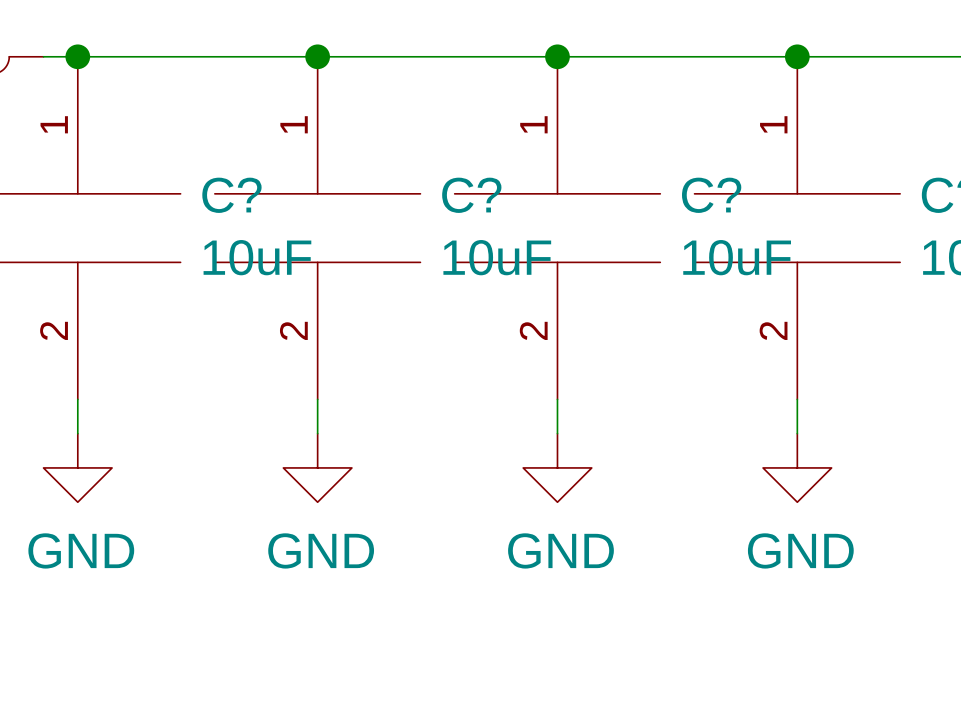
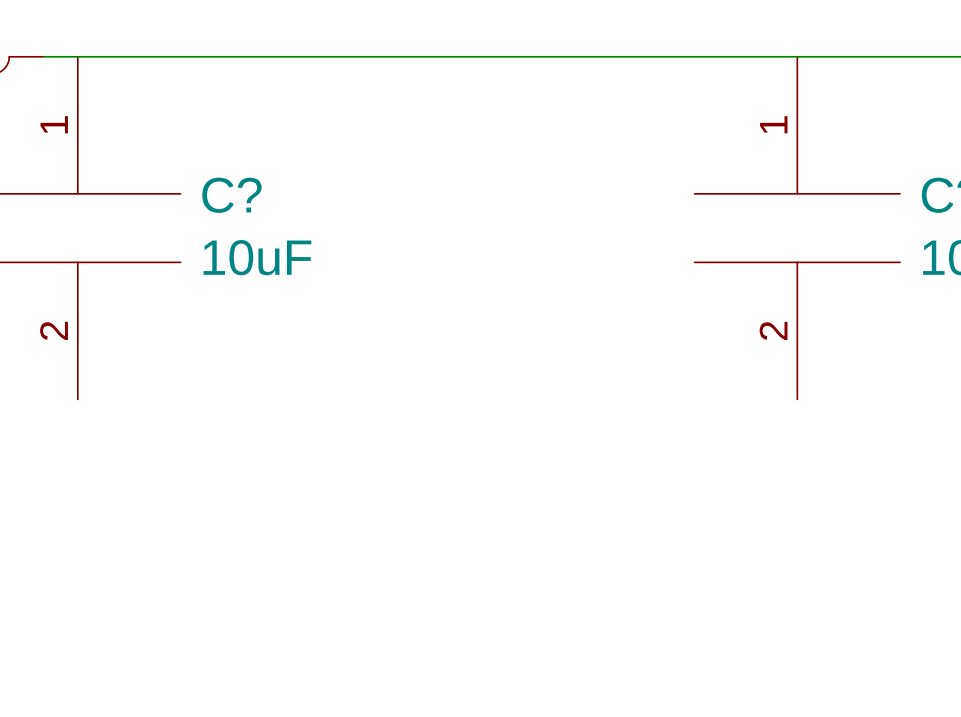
junction: (77, 56) -> none
junction: (317, 56) -> none
junction: (557, 56) -> none
junction: (797, 56) -> none
C?: 10uF (317, 228) -> none
C?: 10uF (557, 228) -> none
wire: (77, 399) (77, 433) -> none
wire: (317, 399) (317, 433) -> none
wire: (557, 399) (557, 433) -> none
wire: (797, 399) (797, 433) -> none
power symbol: GND (77, 467) -> none
power symbol: GND (317, 467) -> none
power symbol: GND (557, 467) -> none
power symbol: GND (797, 467) -> none

